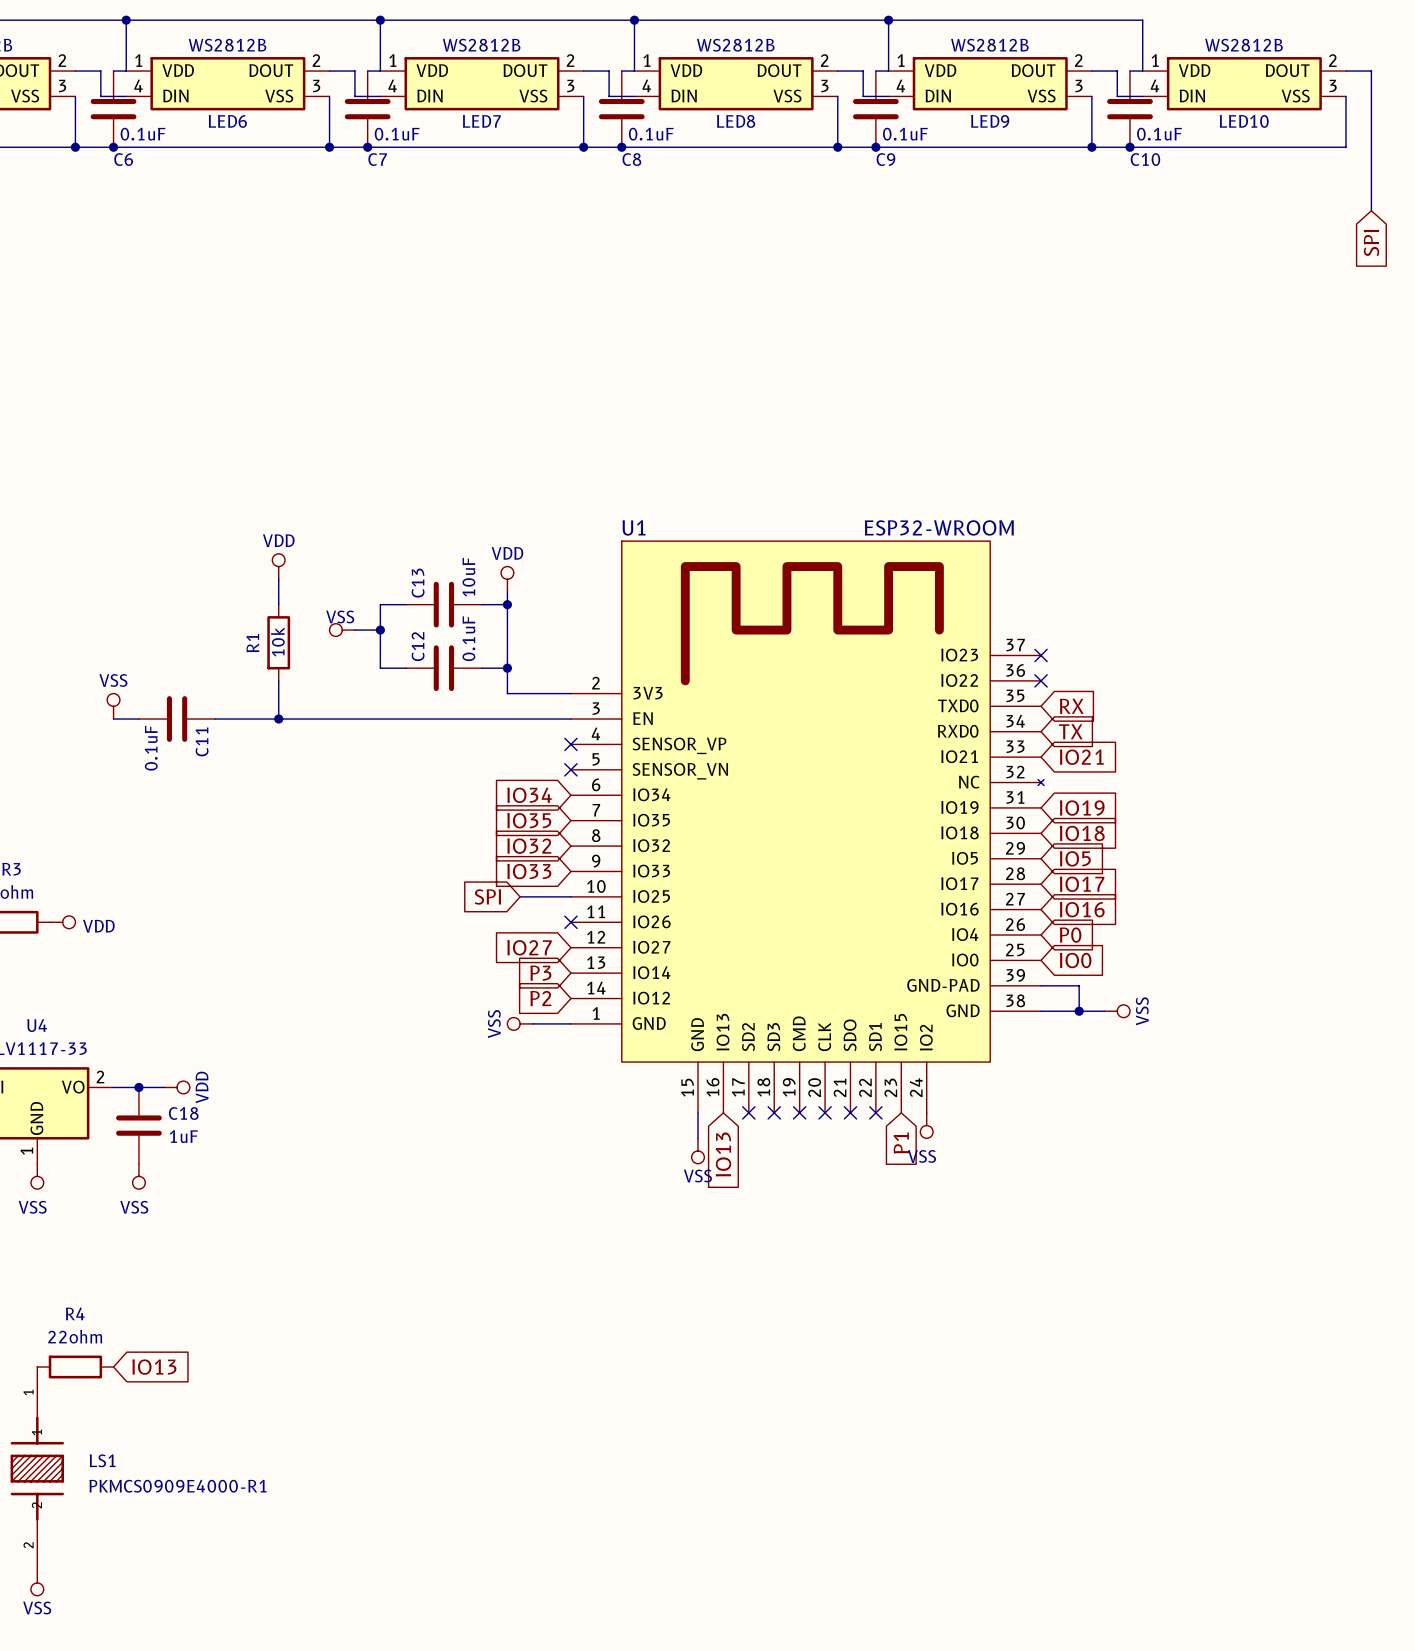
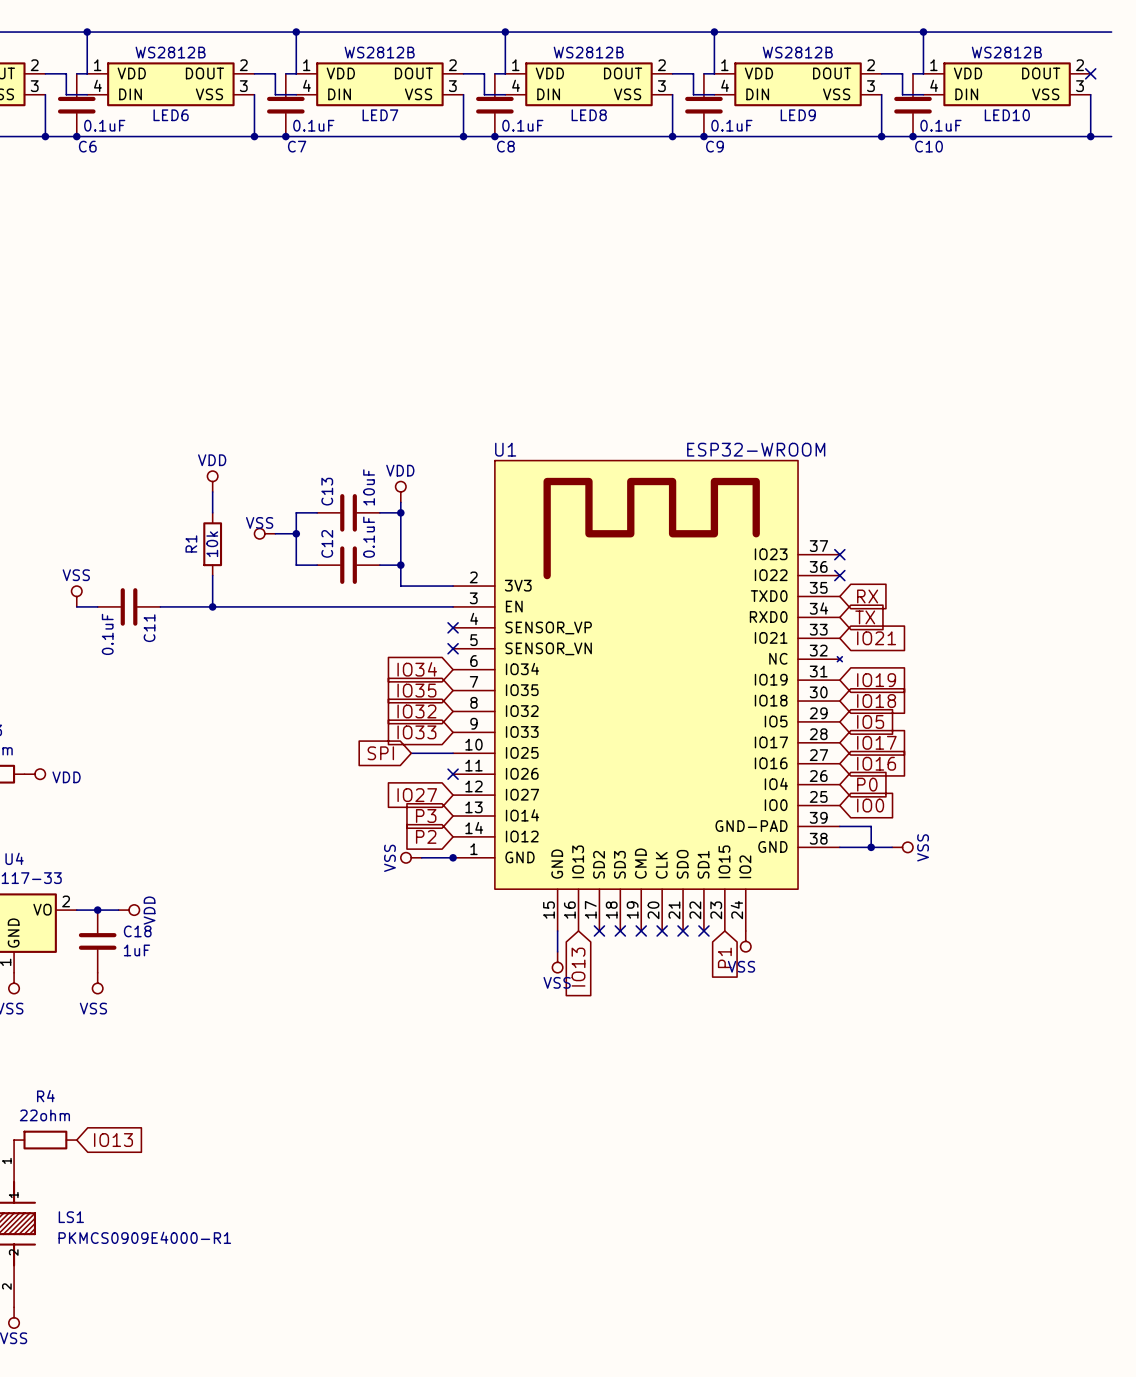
wire: none -> (923, 32) (1111, 32)
junction: none -> (923, 32)
wire: (1345, 71) (1371, 71) (1371, 210) -> none
no-connect mark: none -> (1090, 73)
wire: none -> (1090, 136) (1111, 136)
junction: none -> (1090, 136)
global label: SPI (1371, 243) -> none
junction: none -> (453, 857)

